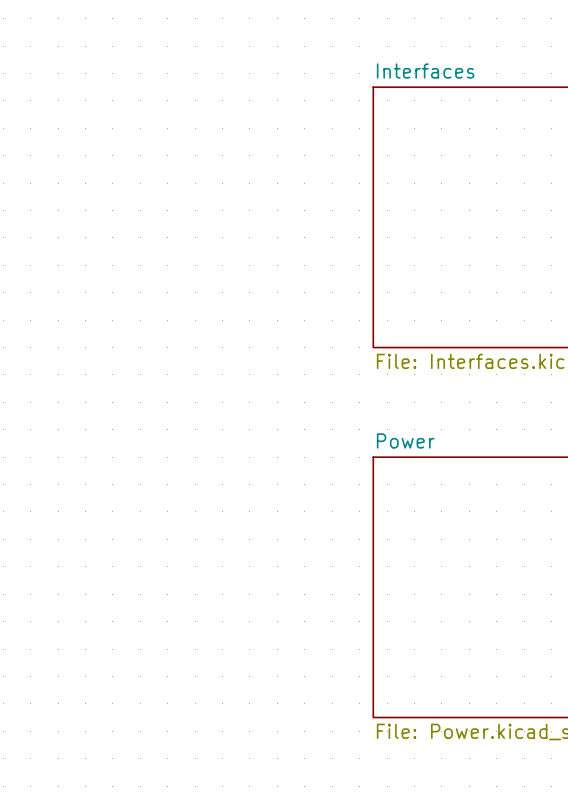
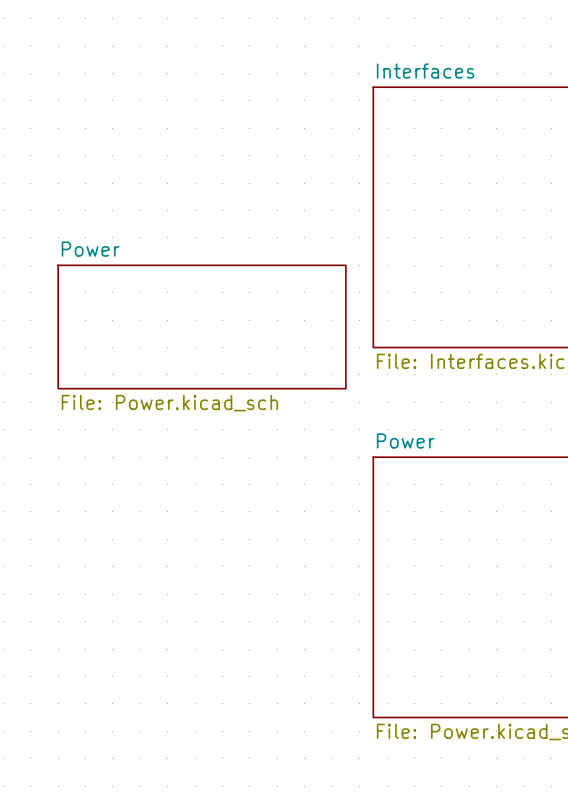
sheet Power: none -> File: Power.kicad_sch (202, 327)

